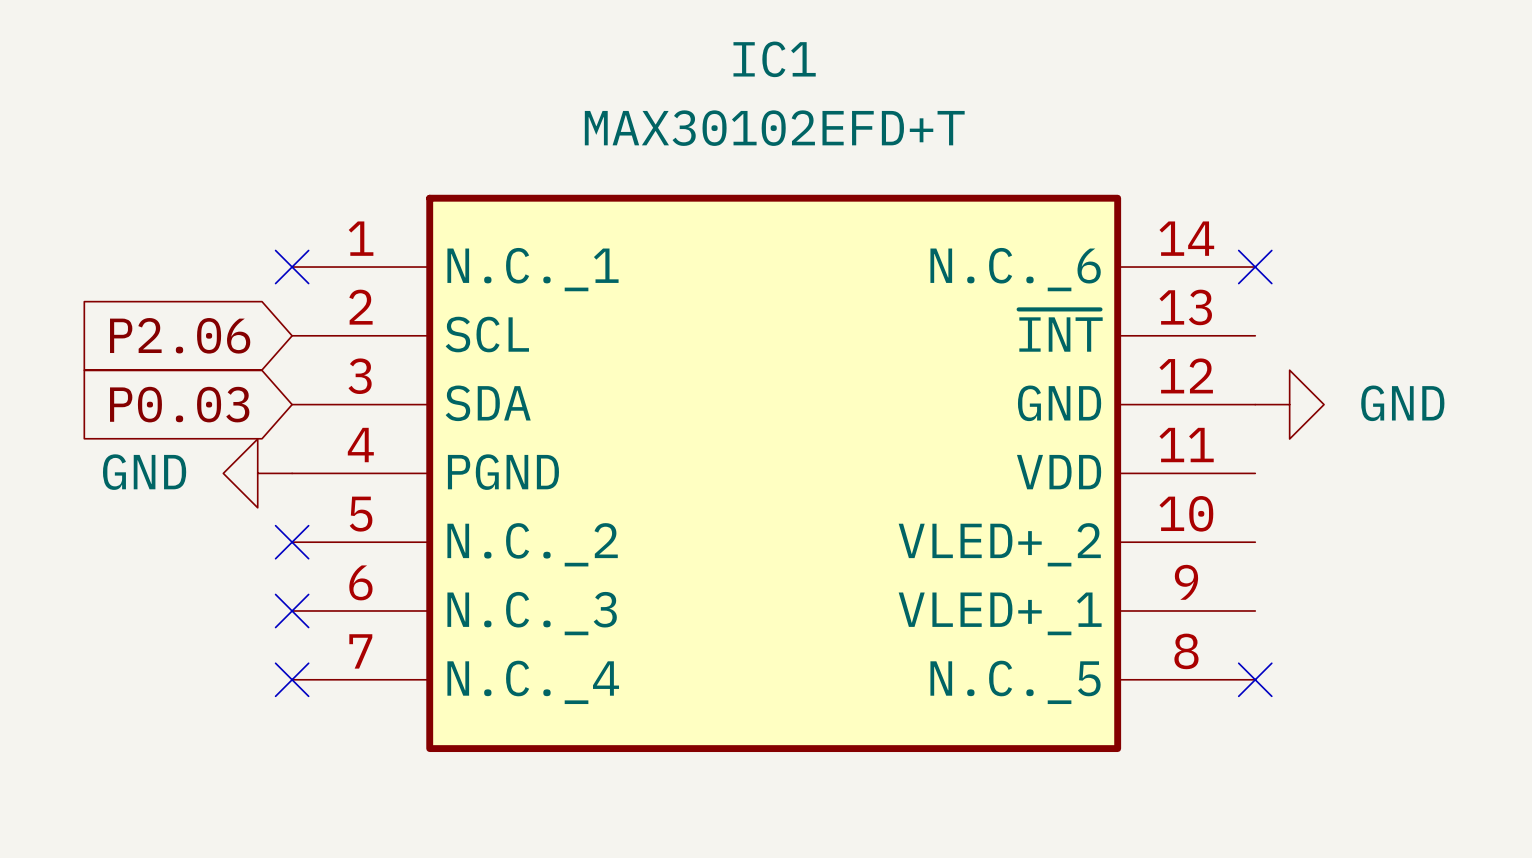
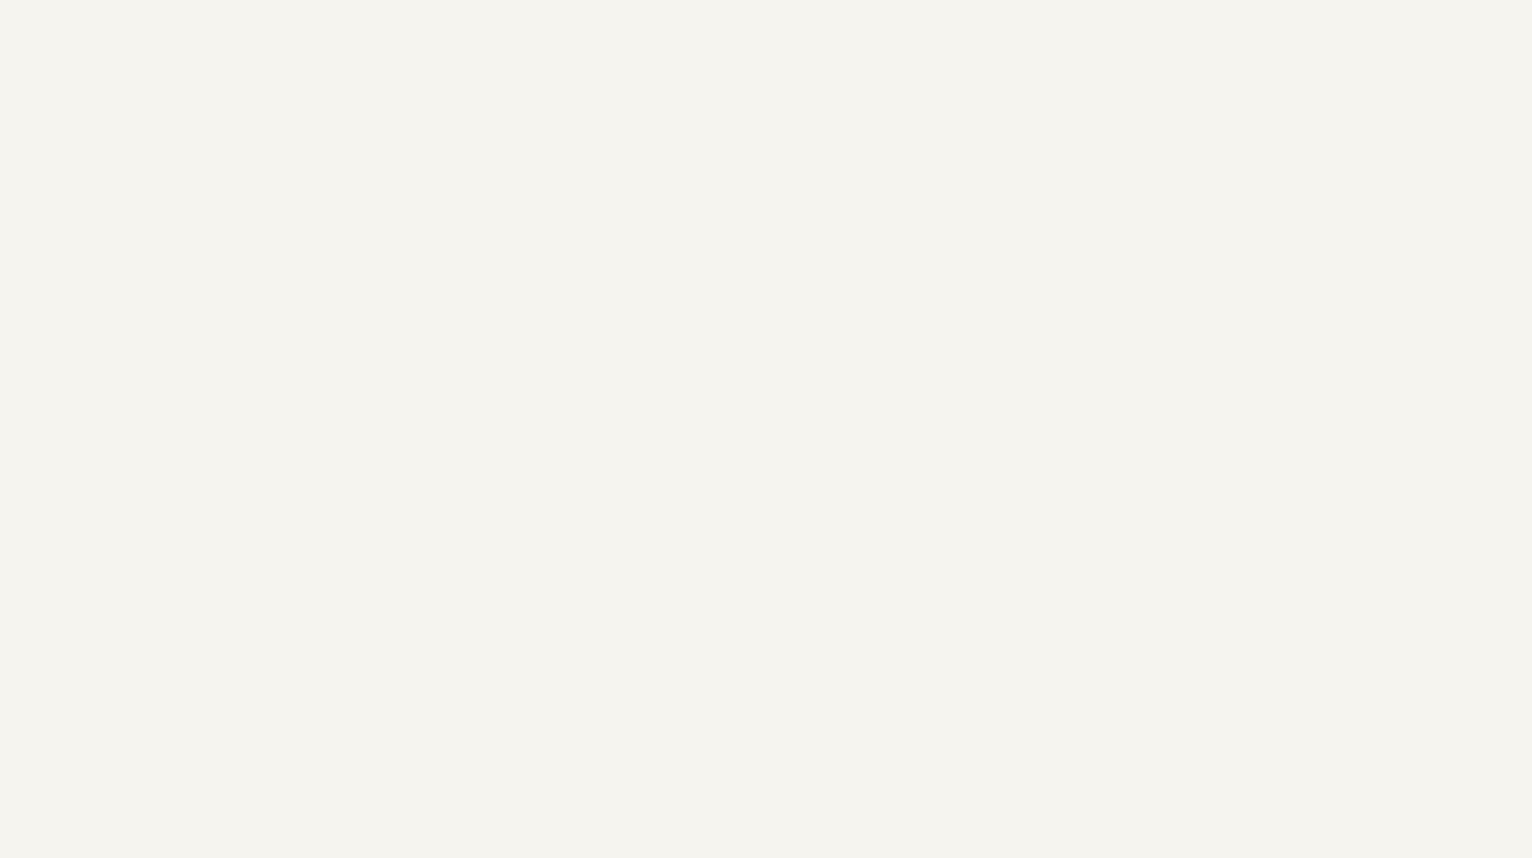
no-connect mark: (292, 267) -> none
no-connect mark: (1255, 267) -> none
global label: P2.06 (180, 335) -> none
global label: P0.03 (179, 404) -> none
power symbol: GND (1289, 404) -> none
power symbol: GND (257, 473) -> none
IC1: MAX30102EFD+T (773, 473) -> none
no-connect mark: (292, 542) -> none
no-connect mark: (292, 610) -> none
no-connect mark: (292, 679) -> none
no-connect mark: (1255, 679) -> none

